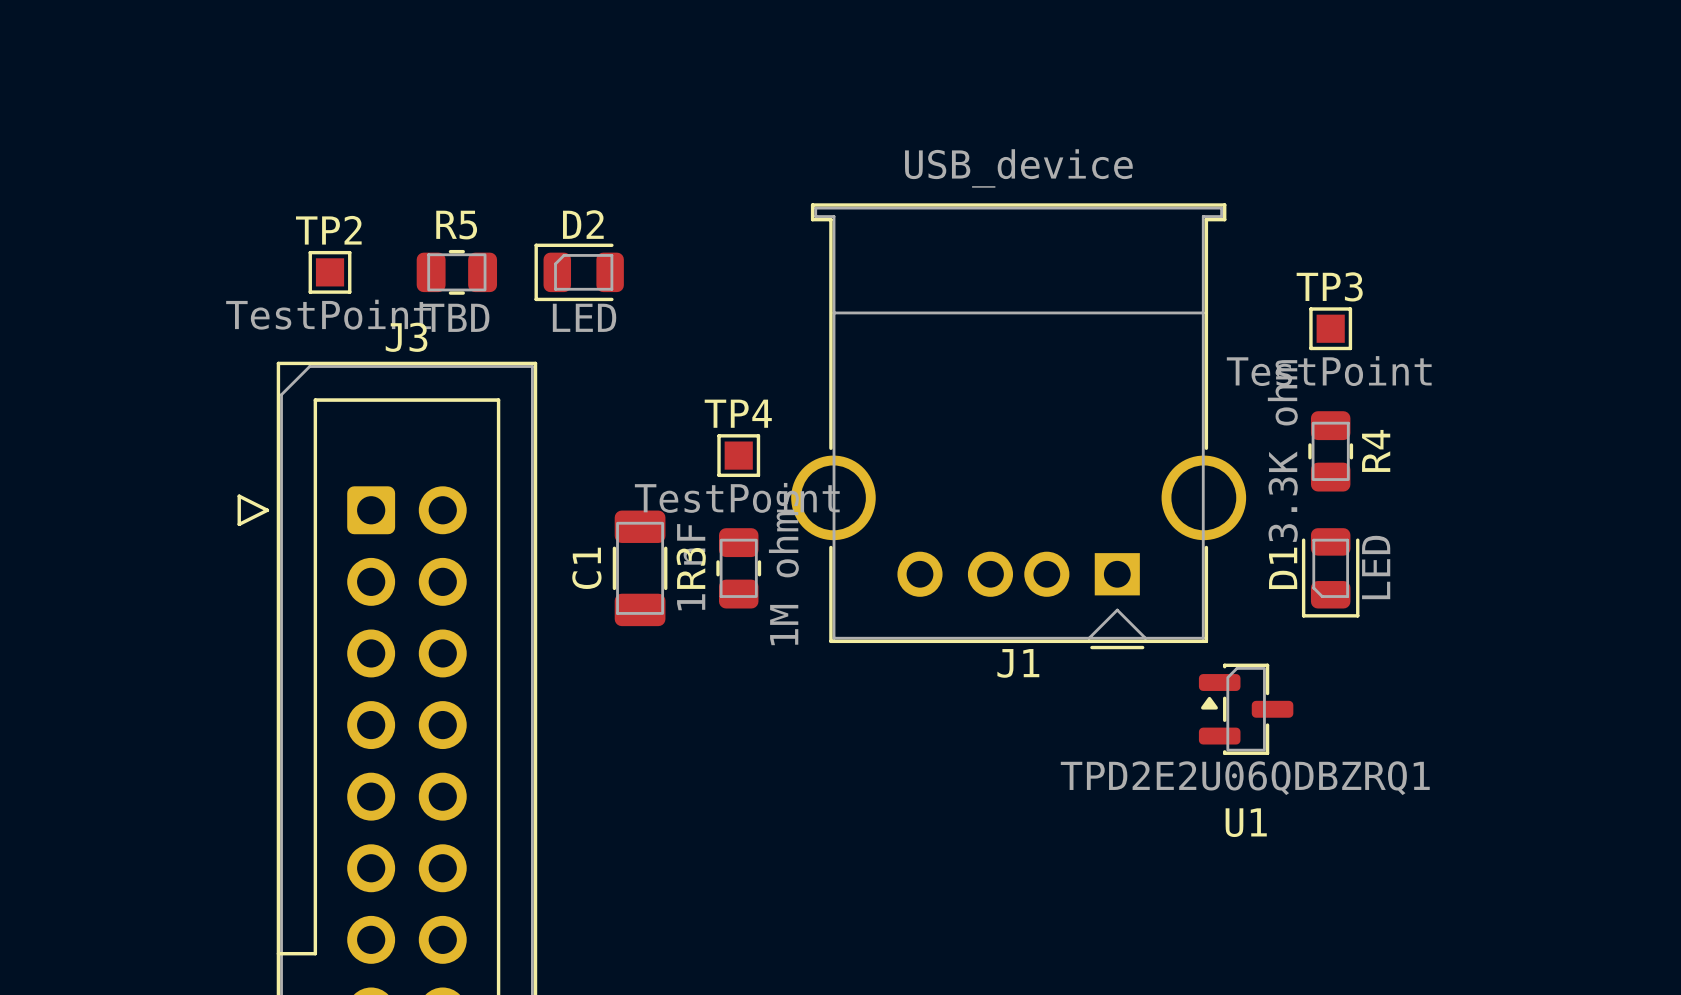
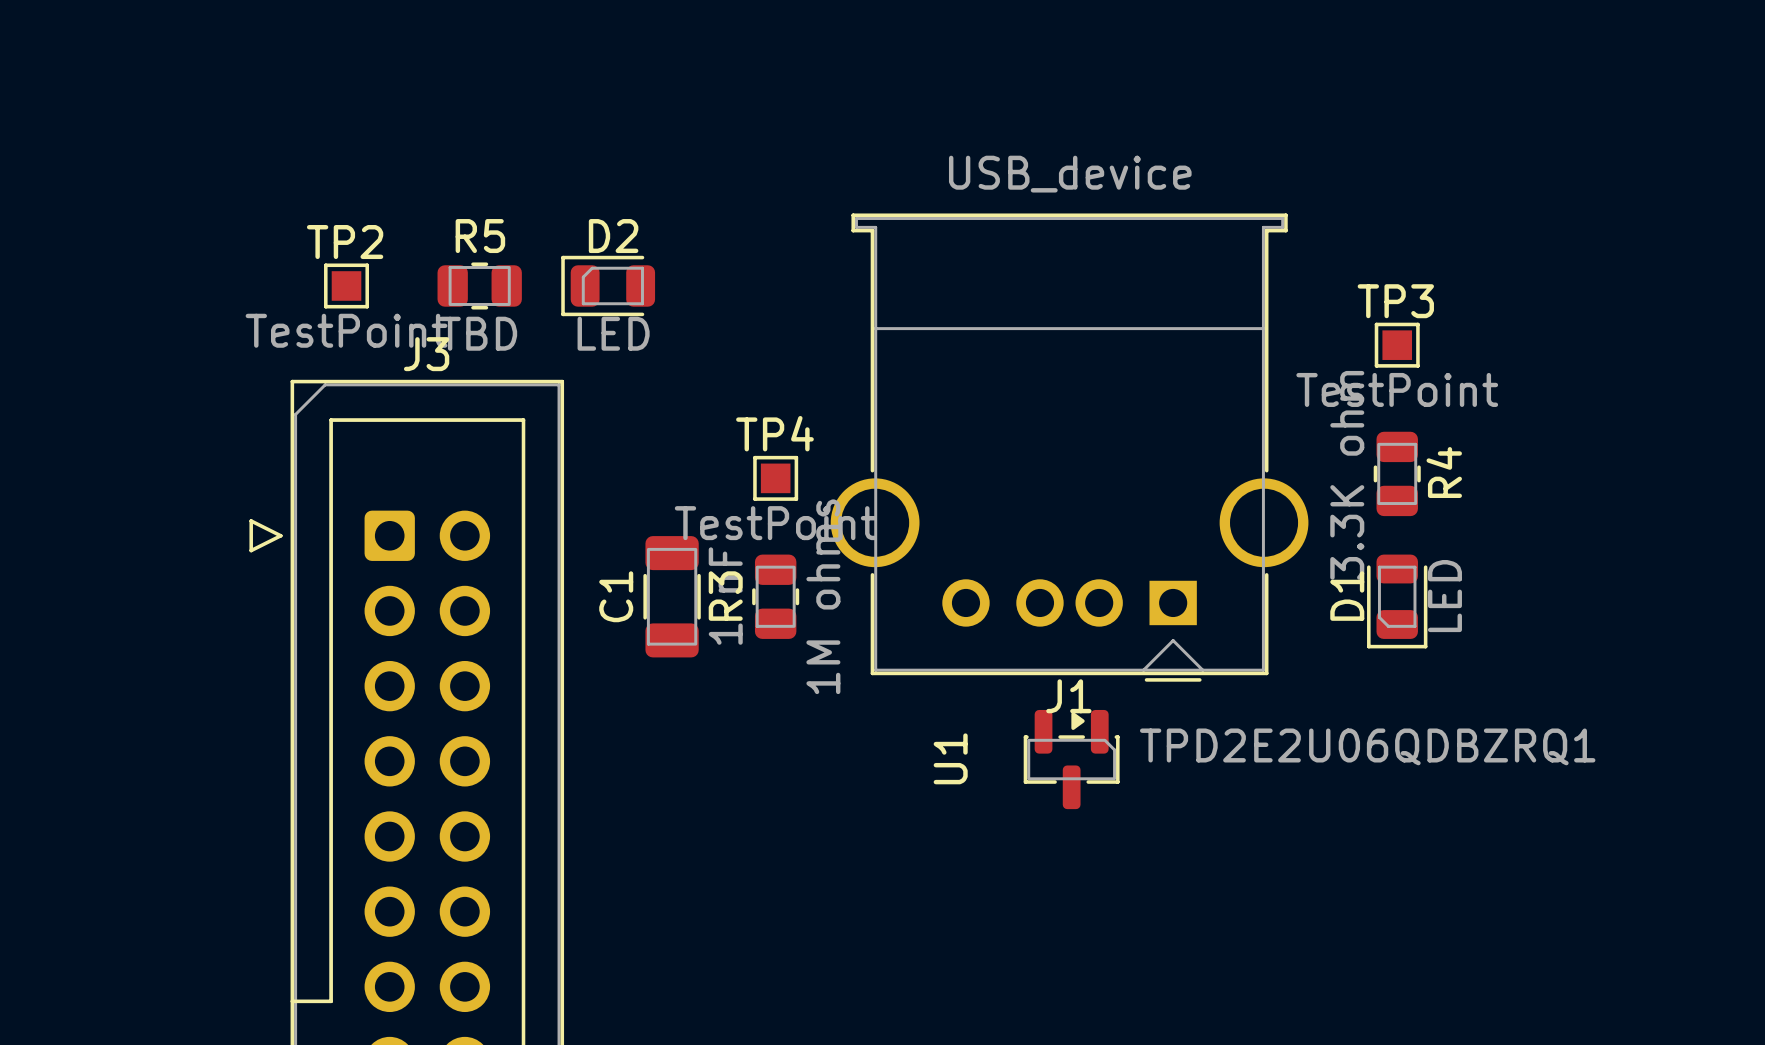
U1 rotation: 0° (1246, 709) -> 90° clockwise (1071, 759)
U1 position: (1246, 709) -> (1071, 759)
U1 value position: TPD2E2U06QDBZRQ1 (1245, 778) -> TPD2E2U06QDBZRQ1 (1367, 746)

